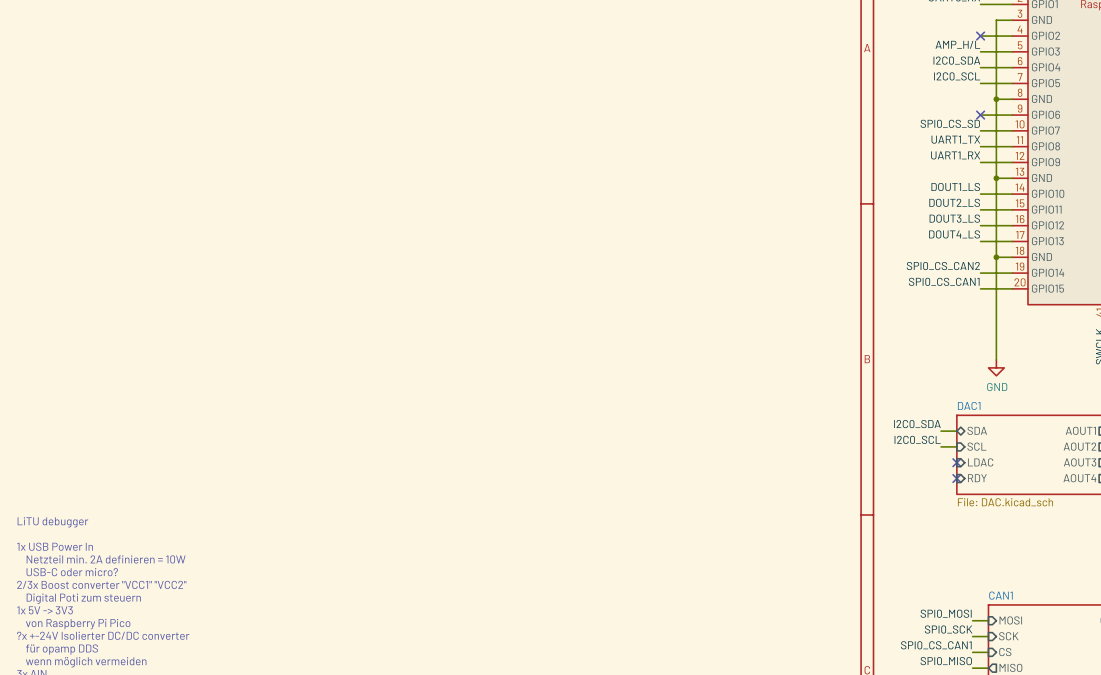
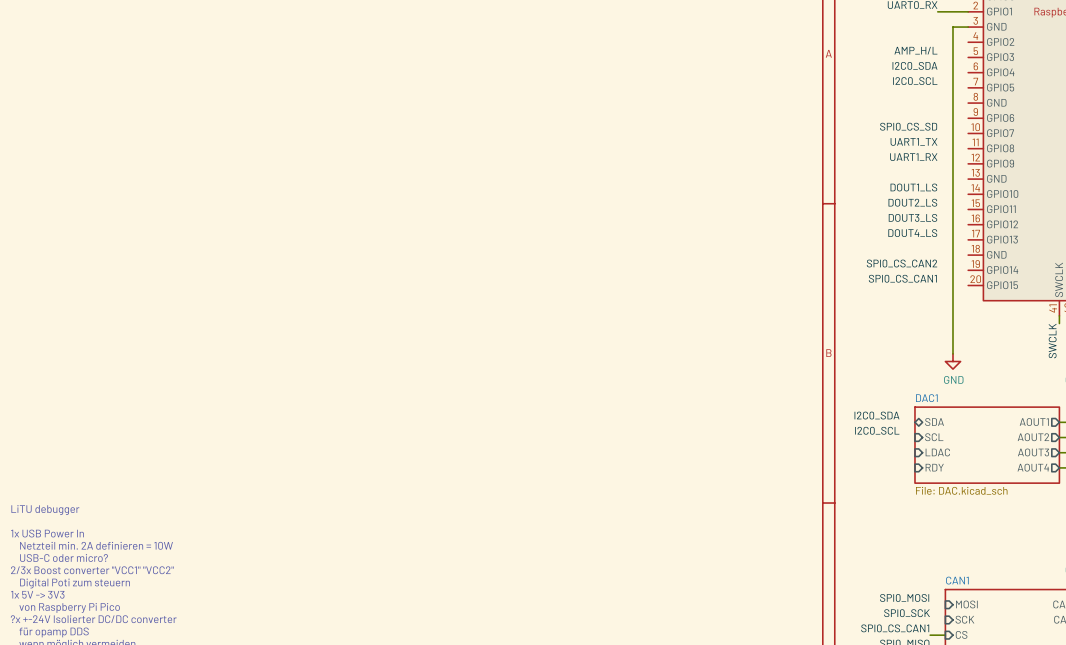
wire: (980, 36) (1012, 36) -> none
no-connect mark: (980, 36) -> none
wire: (980, 51) (1012, 51) -> none
wire: (980, 67) (1012, 67) -> none
wire: (980, 83) (1012, 83) -> none
wire: (996, 99) (1012, 99) -> none
junction: (996, 99) -> none
wire: (980, 115) (1012, 115) -> none
no-connect mark: (980, 115) -> none
wire: (980, 130) (1012, 130) -> none
wire: (980, 146) (1012, 146) -> none
wire: (980, 162) (1012, 162) -> none
wire: (996, 178) (1012, 178) -> none
junction: (996, 178) -> none
wire: (980, 194) (1012, 194) -> none
wire: (980, 209) (1012, 209) -> none
wire: (980, 225) (1012, 225) -> none
wire: (980, 241) (1012, 241) -> none
wire: (996, 257) (1012, 257) -> none
junction: (996, 257) -> none
wire: (980, 273) (1012, 273) -> none
wire: (980, 288) (1012, 288) -> none
wire: (941, 431) (956, 431) -> none
wire: (941, 446) (956, 446) -> none
no-connect mark: (956, 462) -> none
no-connect mark: (956, 478) -> none
wire: (972, 620) (988, 620) -> none
wire: (972, 636) (988, 636) -> none

